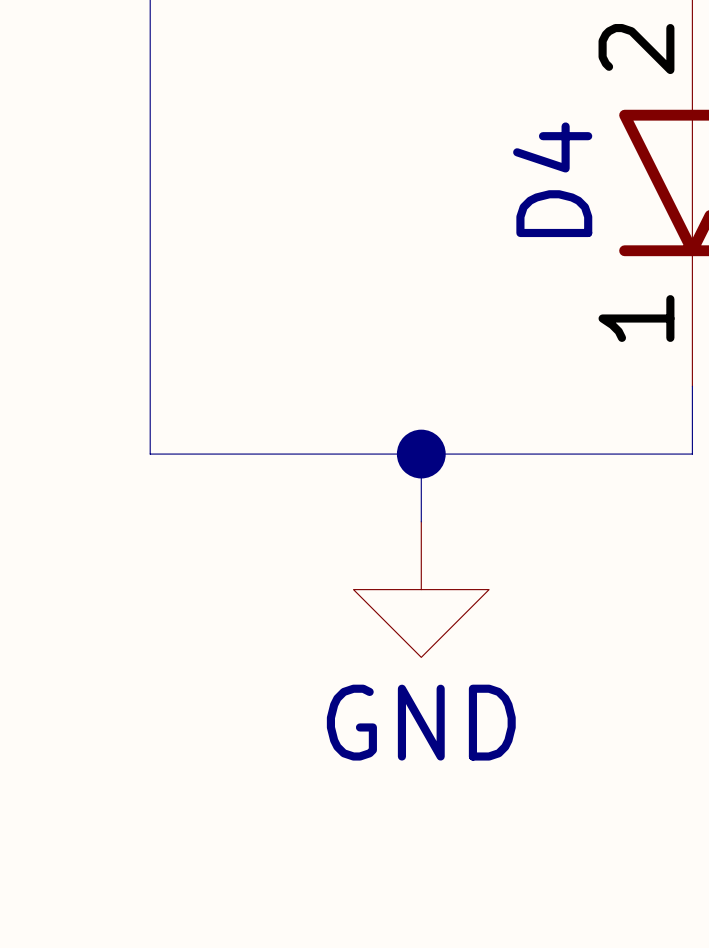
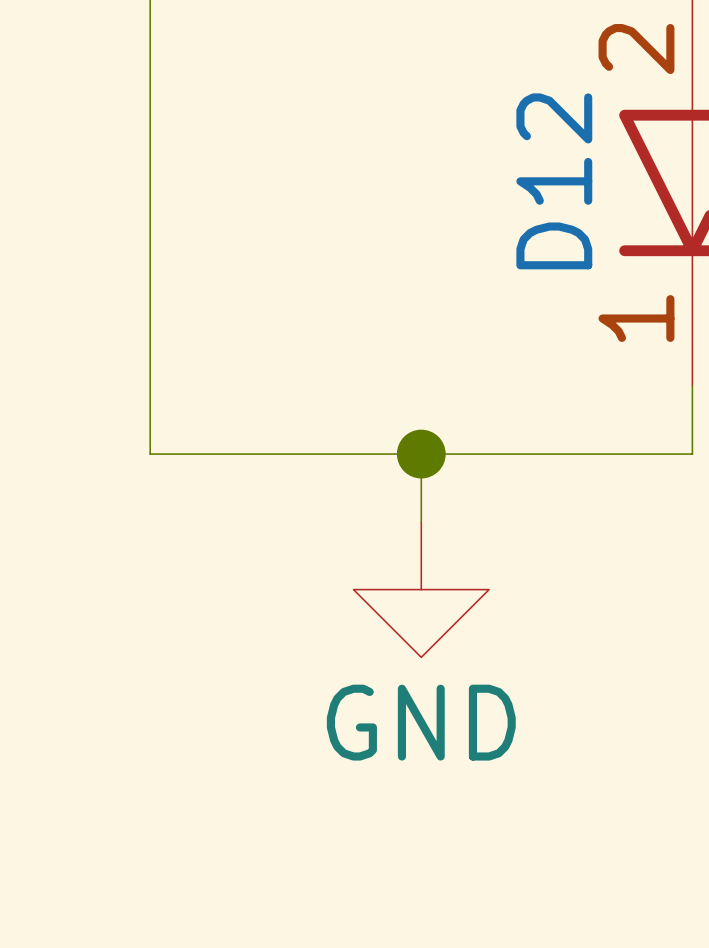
D4 name: D4 (552, 179) -> D12 (554, 181)

